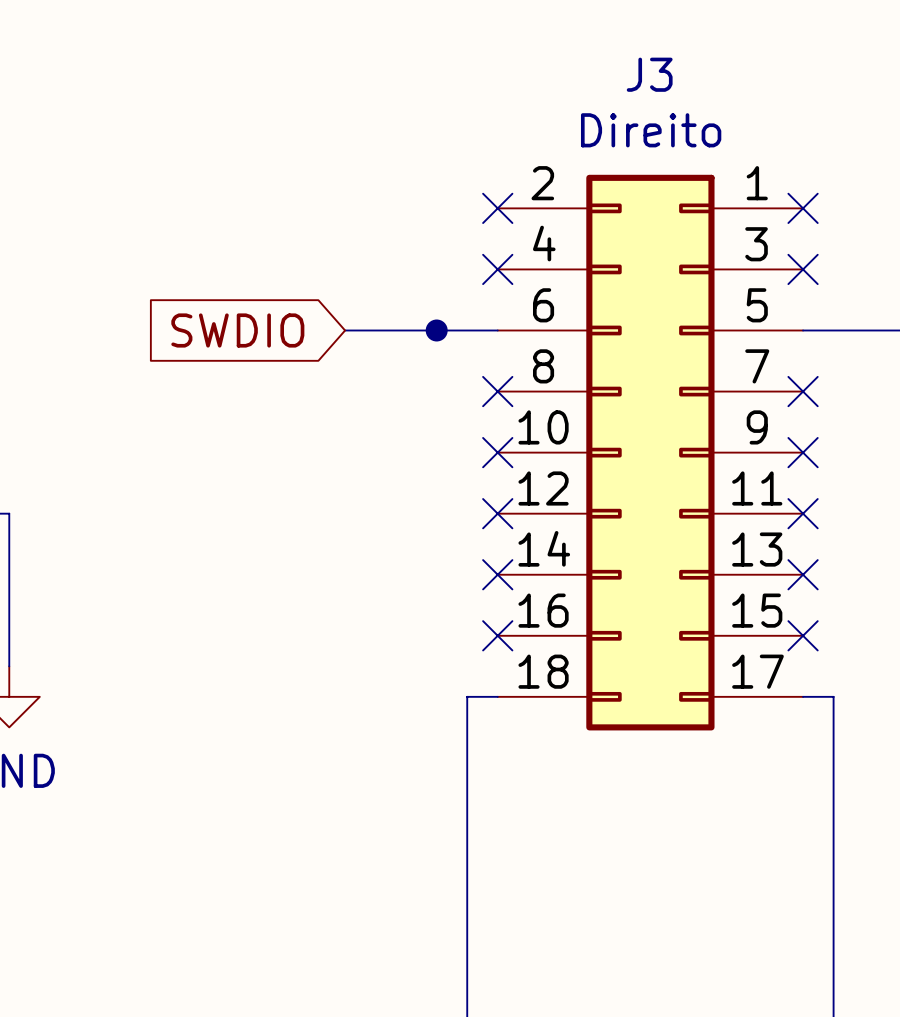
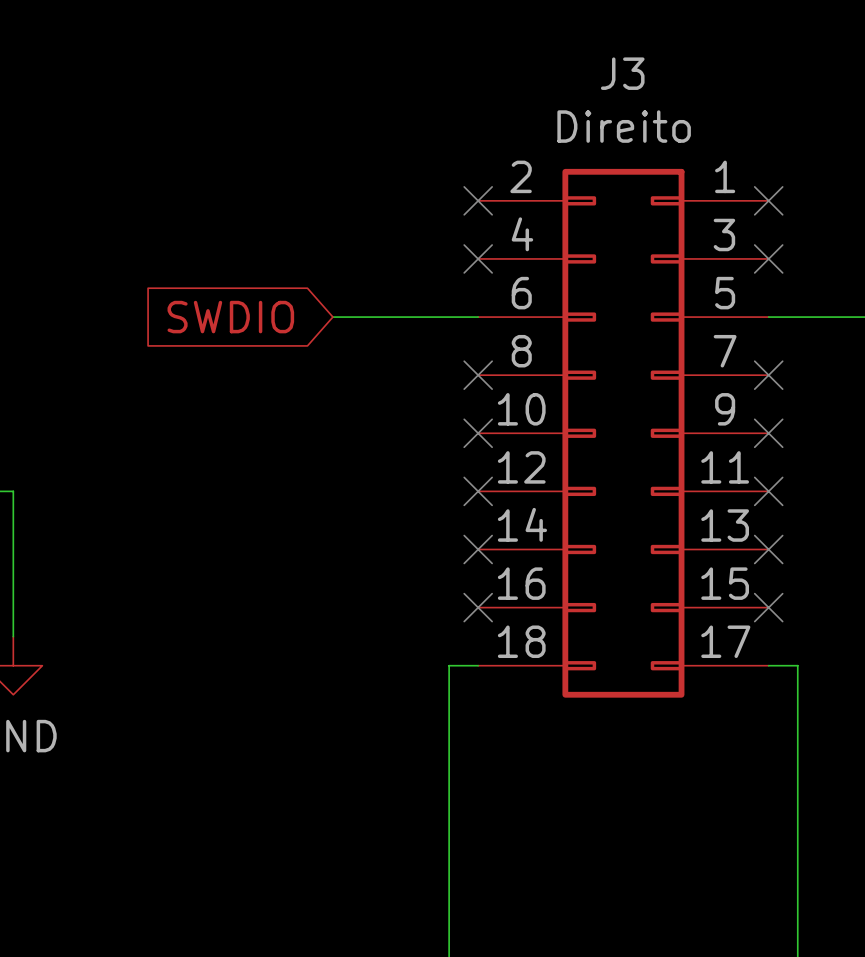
junction: (436, 330) -> none

